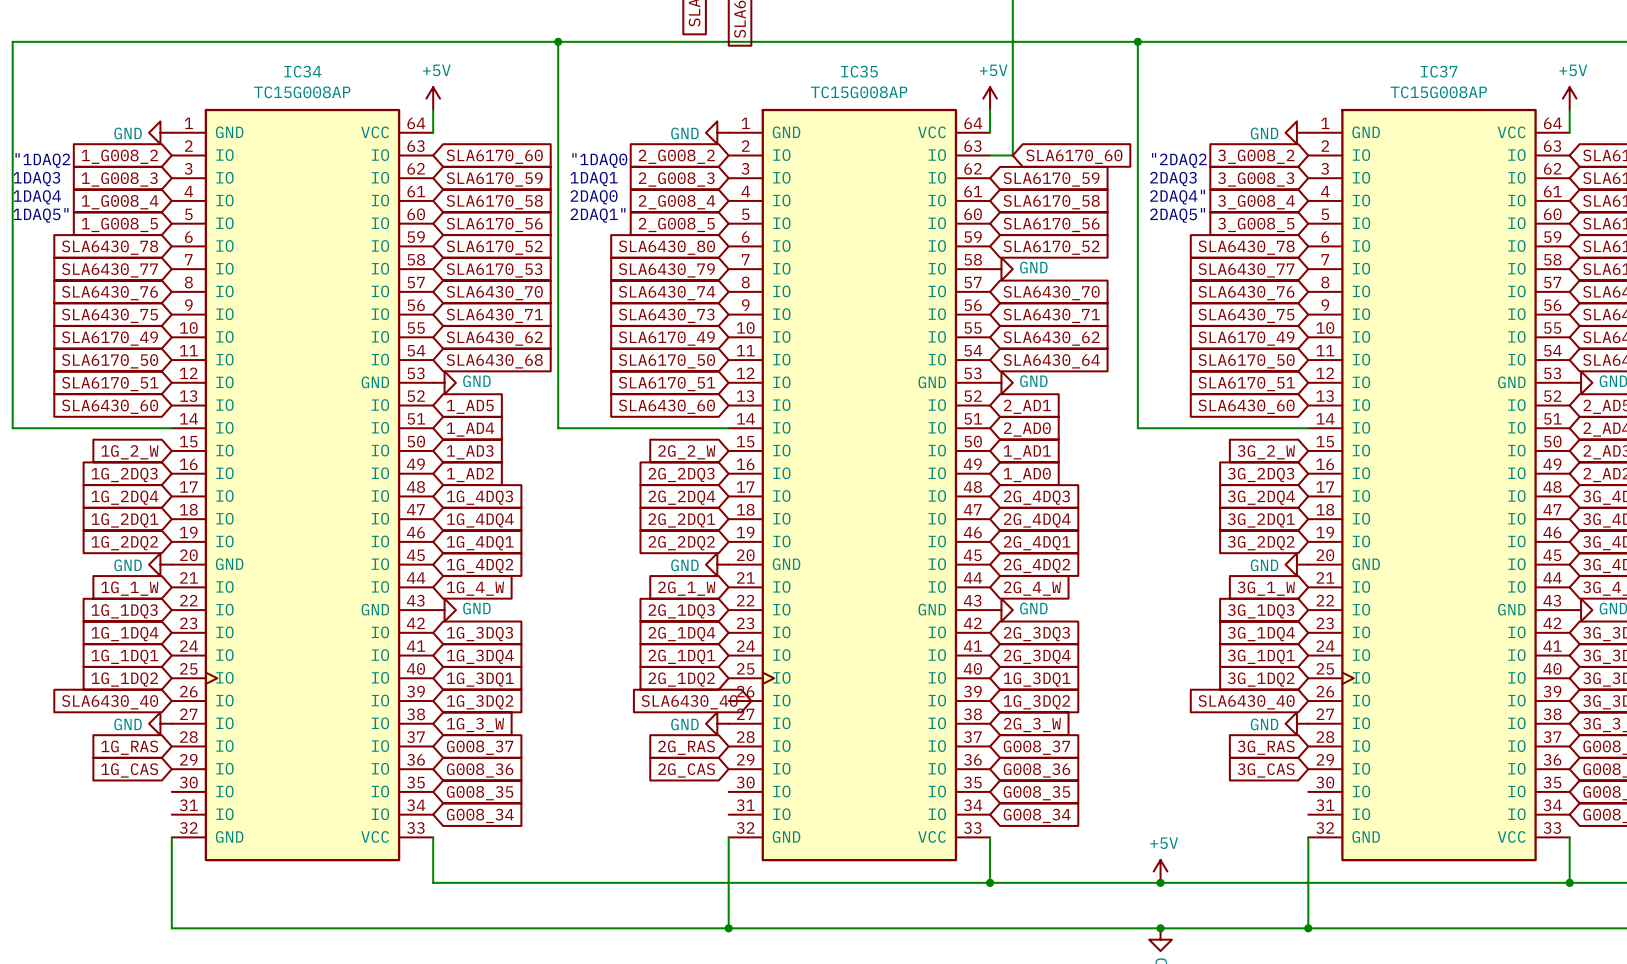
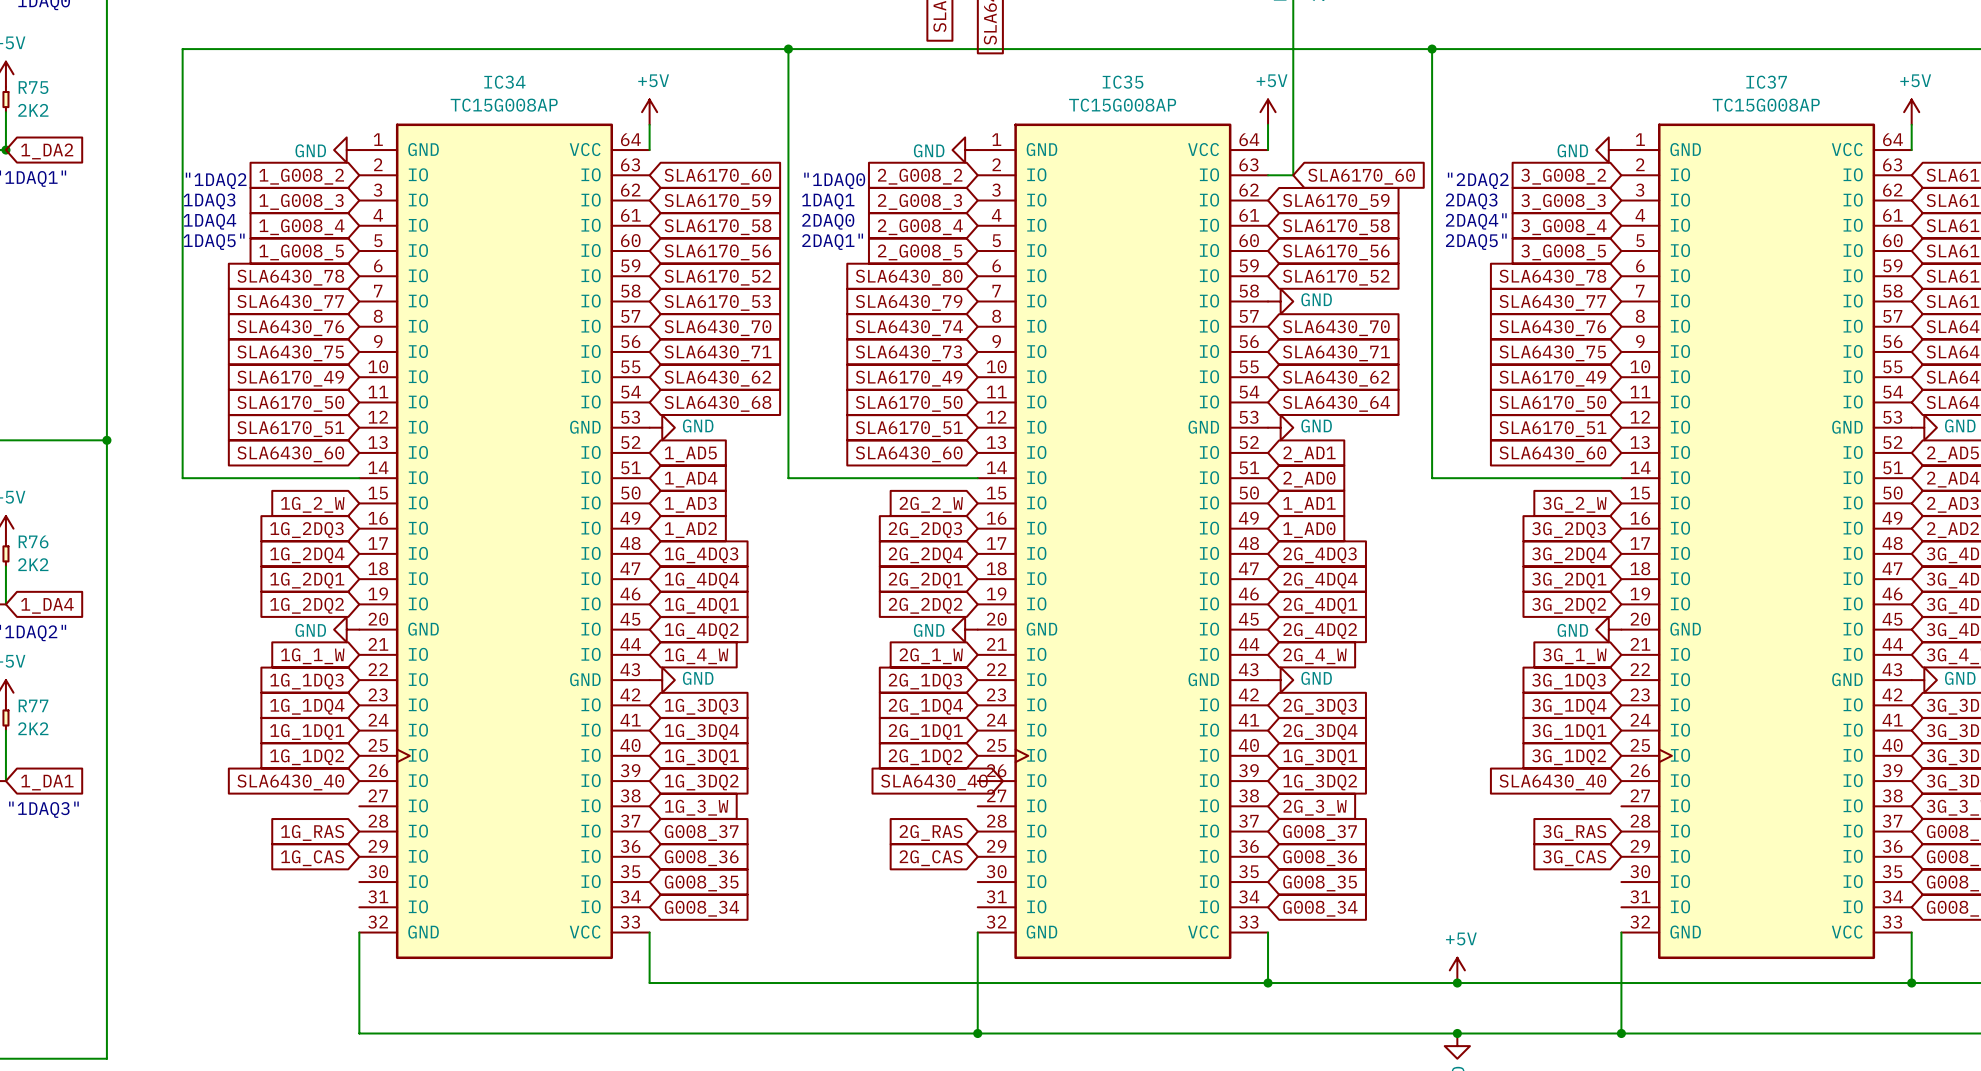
power symbol: GND (160, 723) -> none
power symbol: GND (717, 723) -> none
power symbol: GND (1296, 723) -> none

